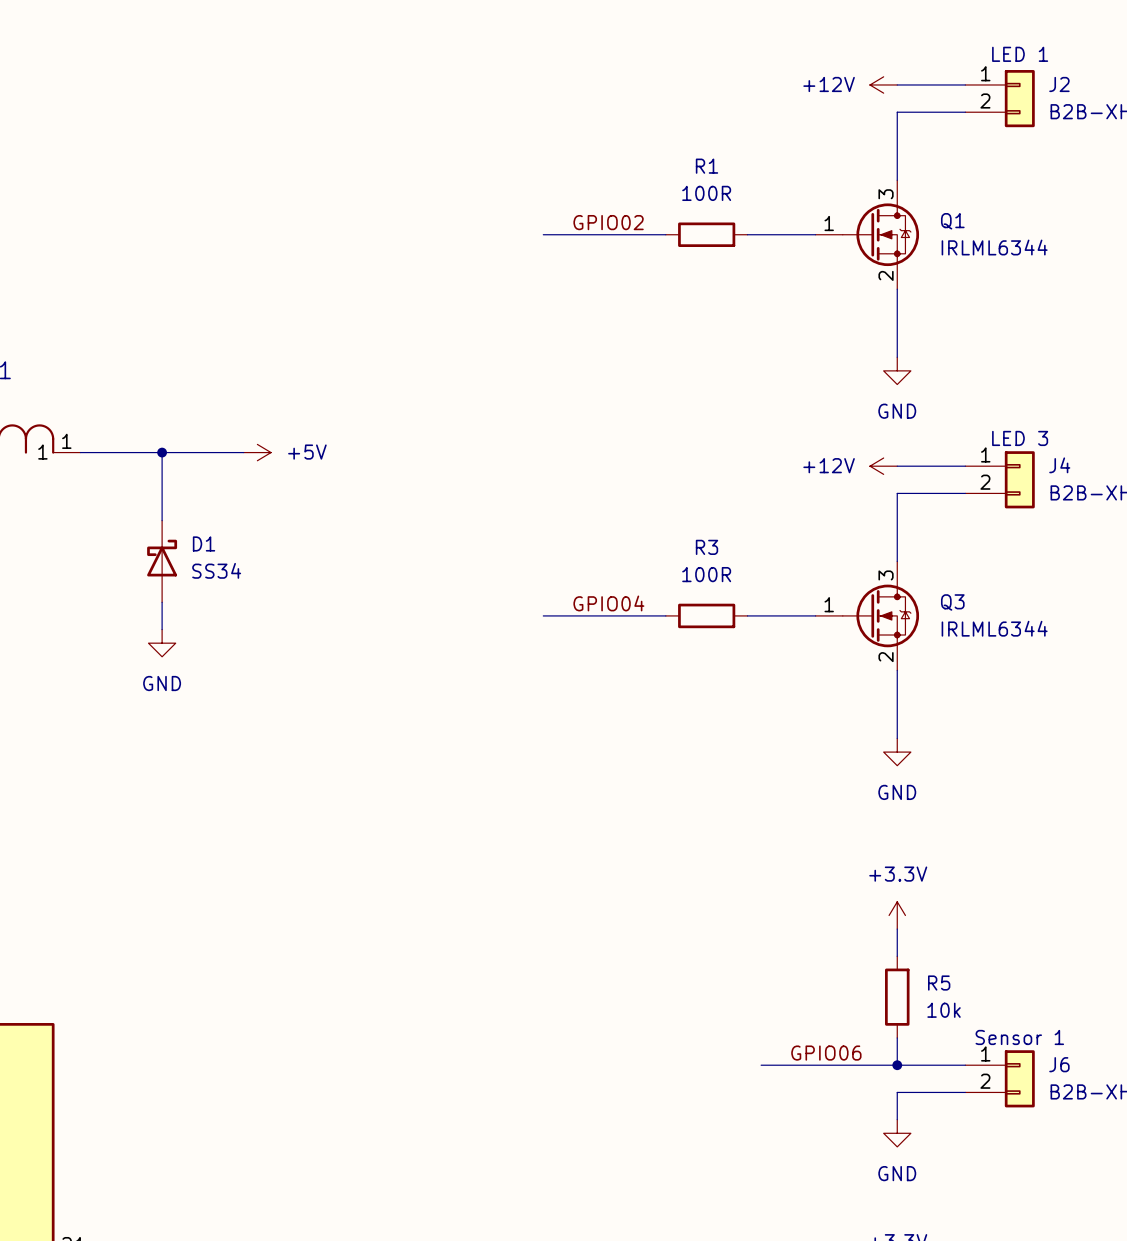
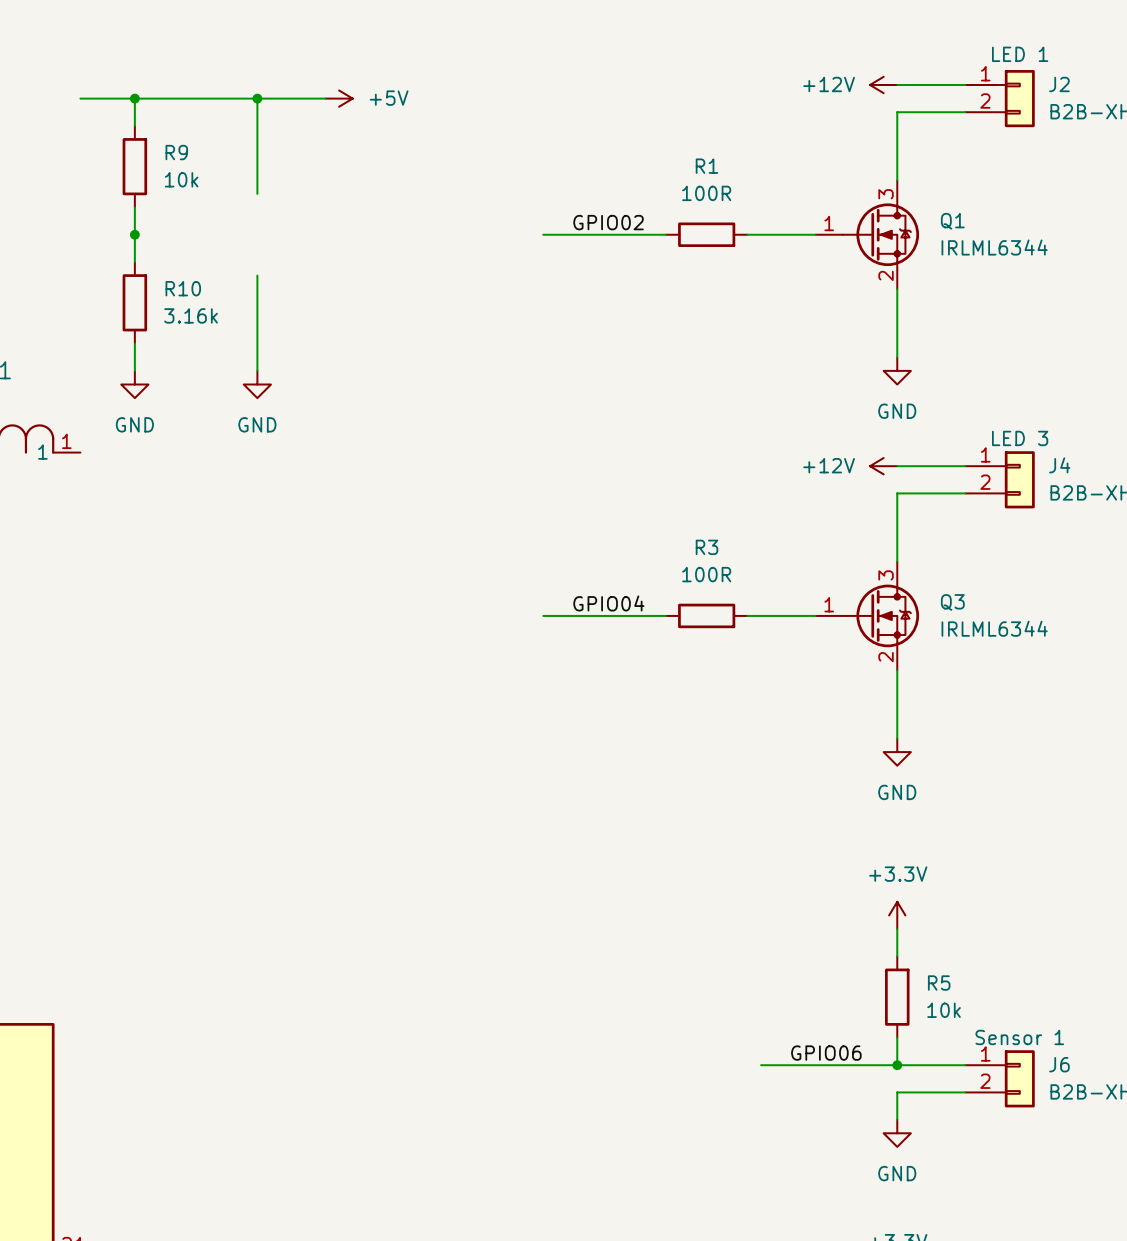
wire: none -> (80, 98) (325, 98)
wire: none -> (134, 98) (134, 125)
junction: none -> (134, 98)
wire: none -> (257, 98) (257, 193)
junction: none -> (257, 98)
power symbol: none -> +5V (339, 98)
R9: none -> 10k (134, 166)
wire: none -> (134, 207) (134, 261)
junction: none -> (134, 234)
wire: none -> (257, 275) (257, 370)
R10: none -> 3.16k (134, 302)
power symbol: none -> GND (134, 384)
power symbol: none -> GND (257, 384)
wire: (80, 452) (243, 452) -> none
wire: (162, 452) (162, 520) -> none
junction: (162, 452) -> none
power symbol: +5V (257, 452) -> none
D1: SS34 (162, 561) -> none
wire: (162, 602) (162, 629) -> (134, 343) (134, 370)
power symbol: GND (162, 643) -> none

